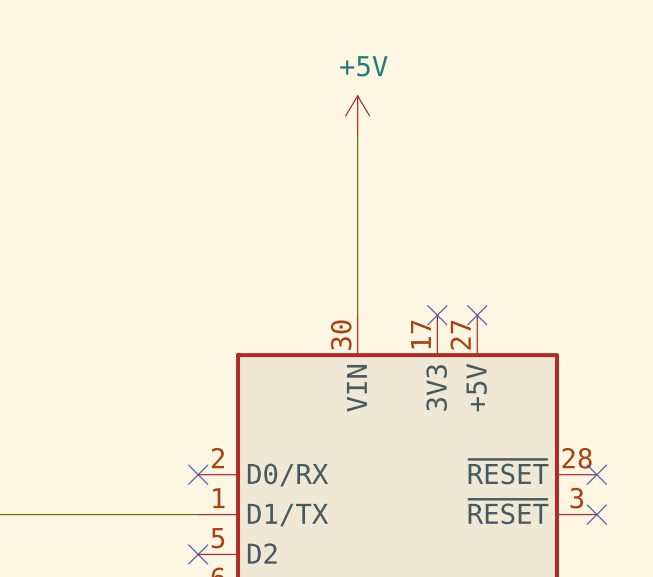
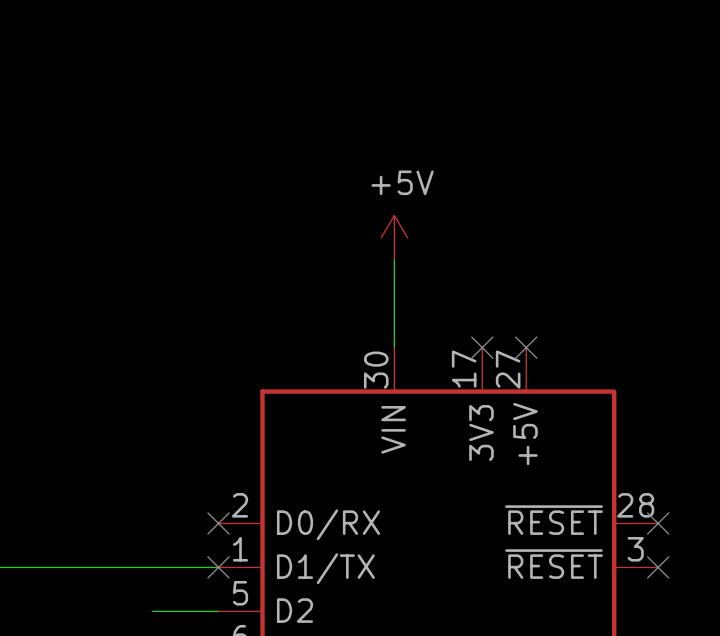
power symbol position: +5V (357, 115) -> +5V (394, 237)
wire: (357, 135) (357, 235) -> none
no-connect mark: none -> (218, 567)
wire: none -> (152, 611) (218, 611)
no-connect mark: (198, 554) -> none

